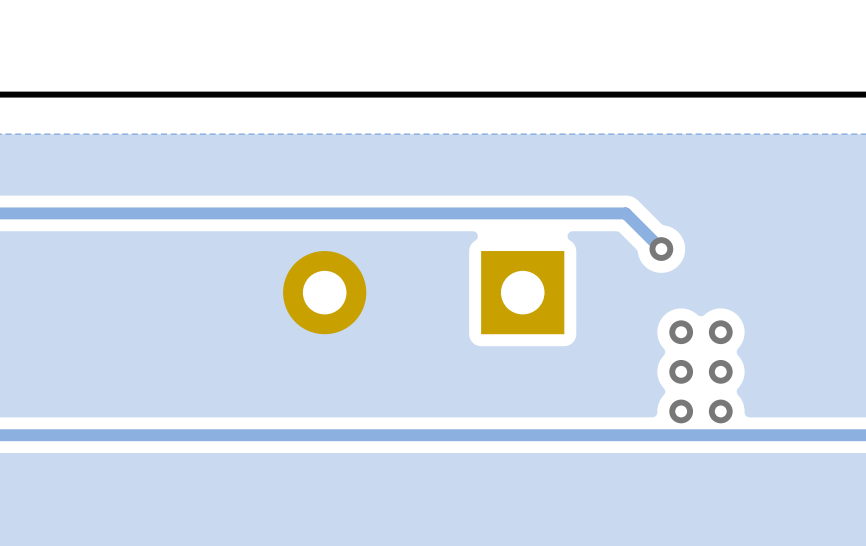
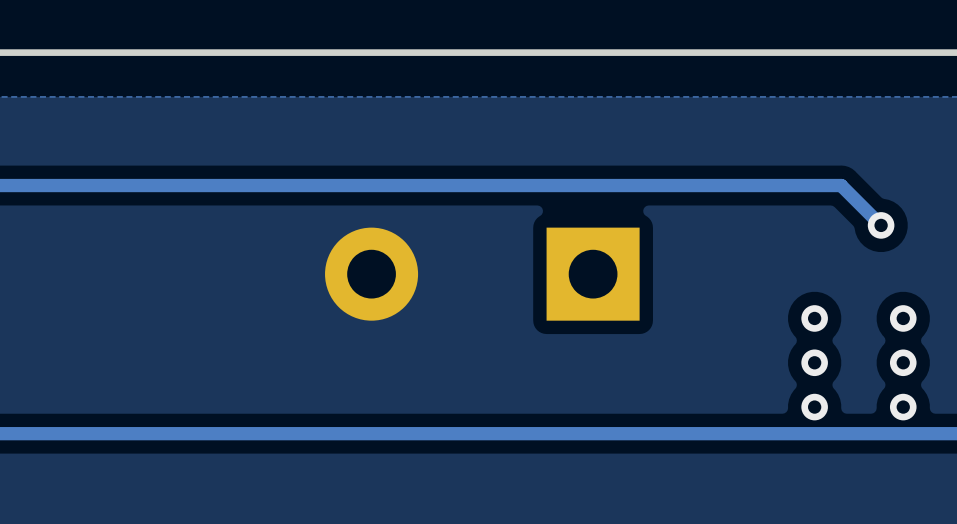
track: (625, 213) (661, 249) -> (708, 185) (841, 185) (881, 225)
via: (661, 249) -> none
via: none -> (881, 225)
via: (681, 332) -> none
via: none -> (903, 318)
via: (681, 371) -> none
via: none -> (903, 362)
via: (681, 411) -> none
via: none -> (903, 407)

